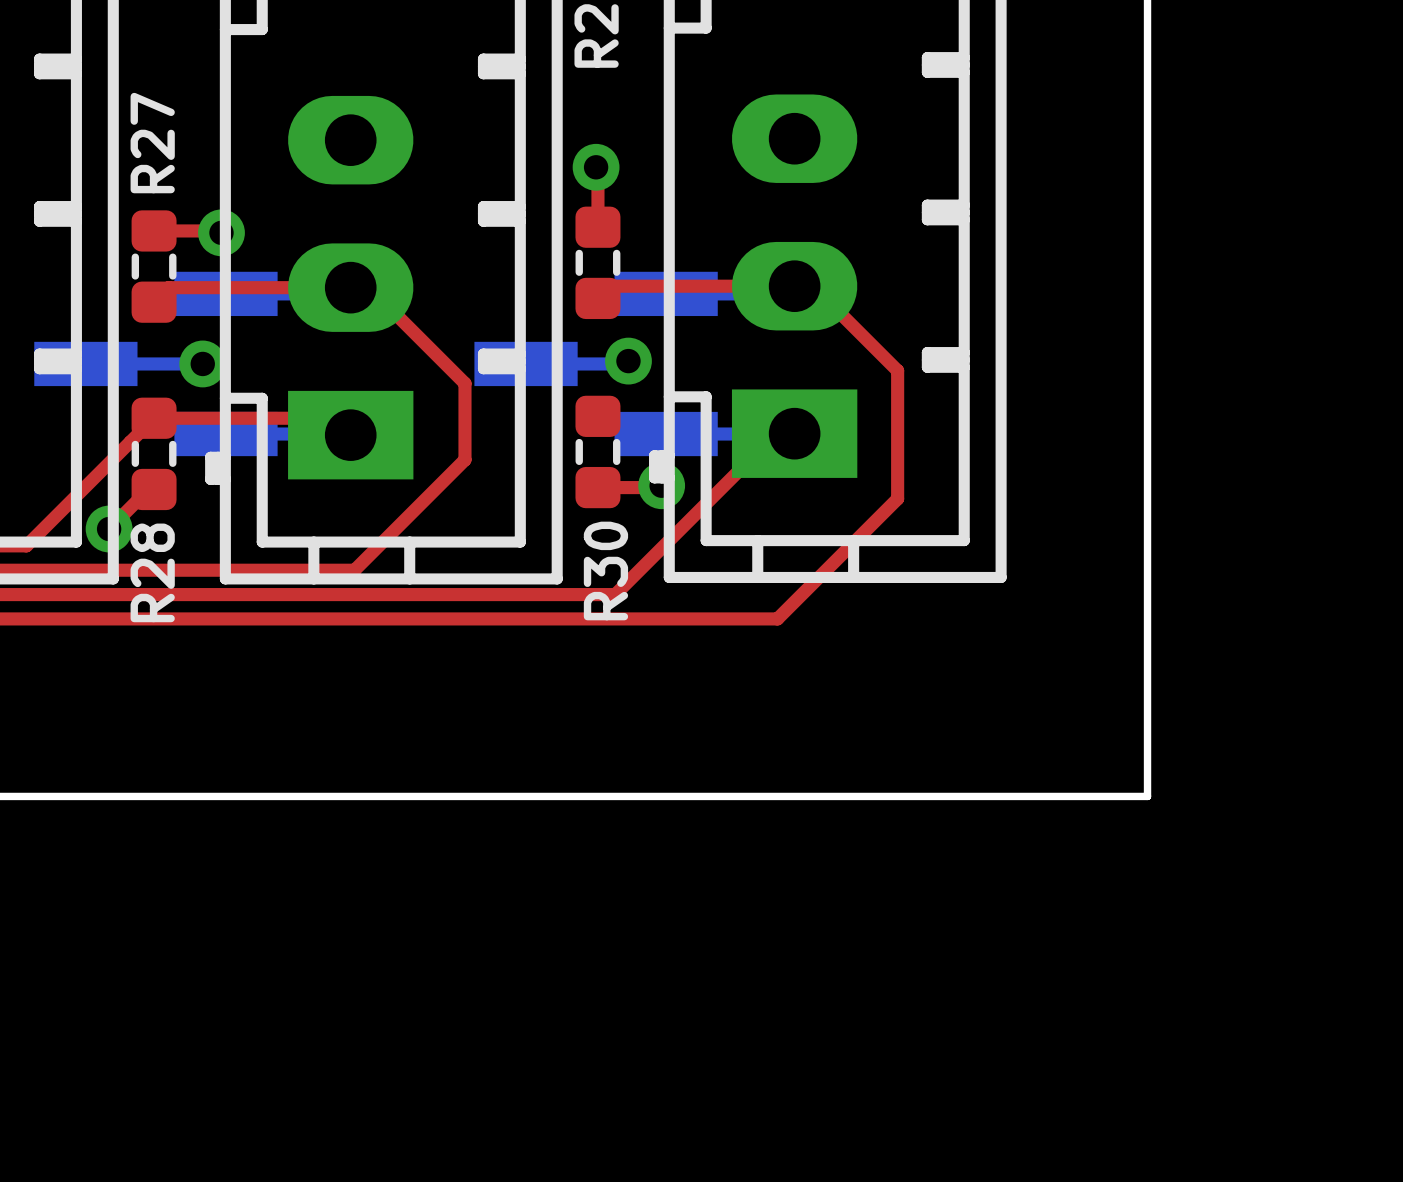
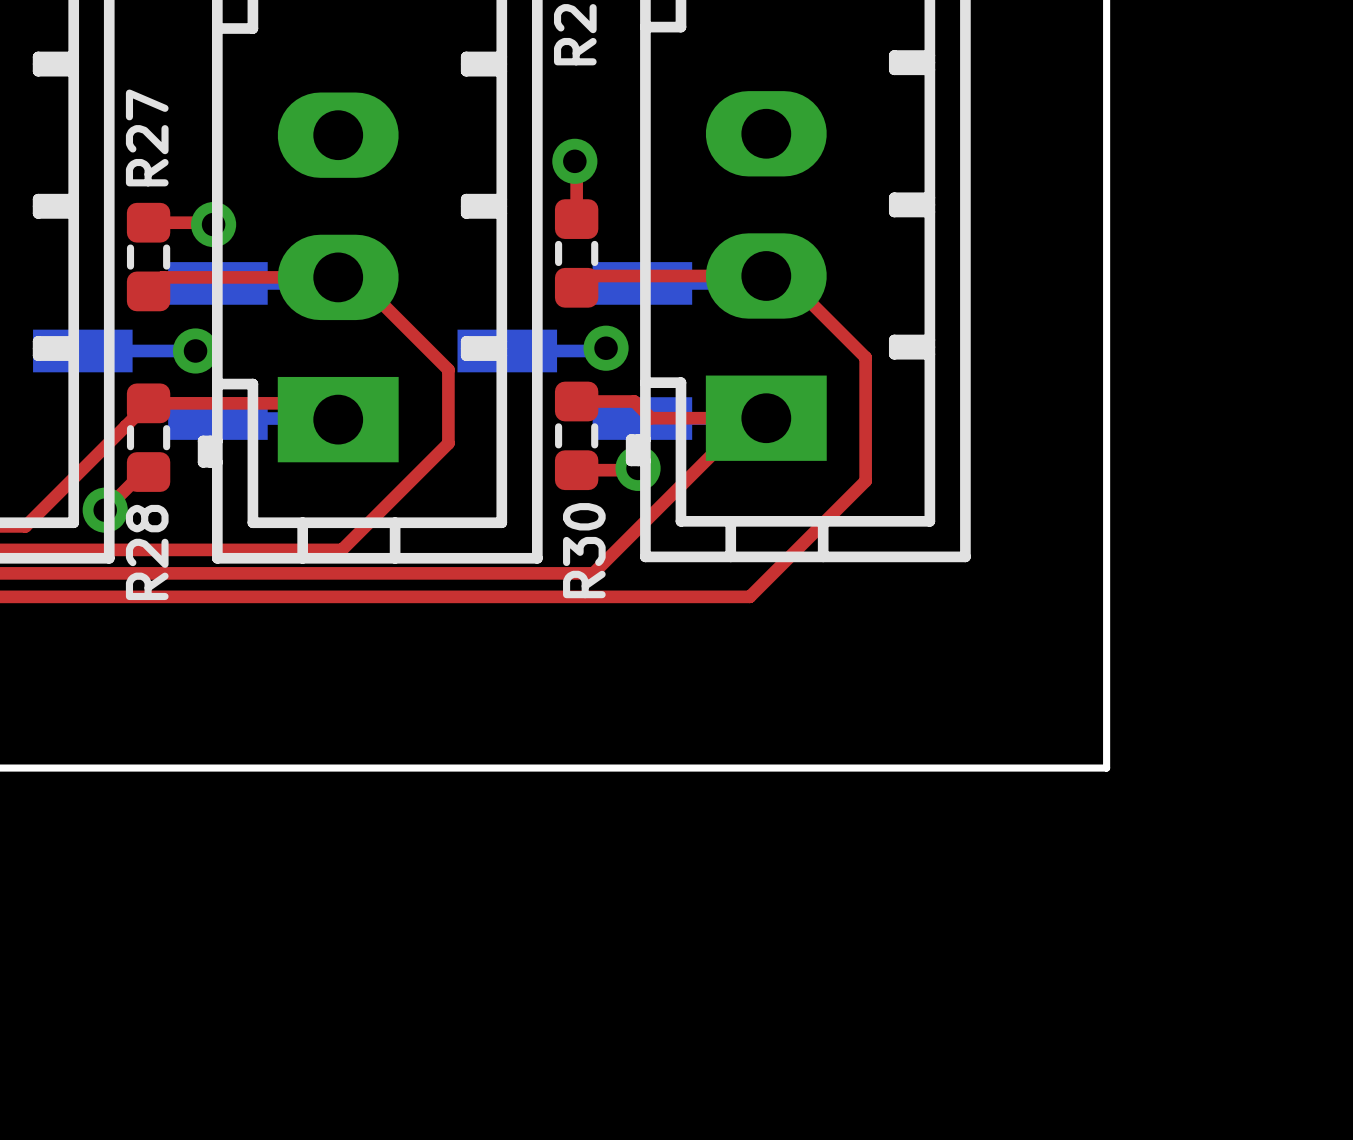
top track: none -> (576, 401) (634, 401) (651, 418) (748, 418)

